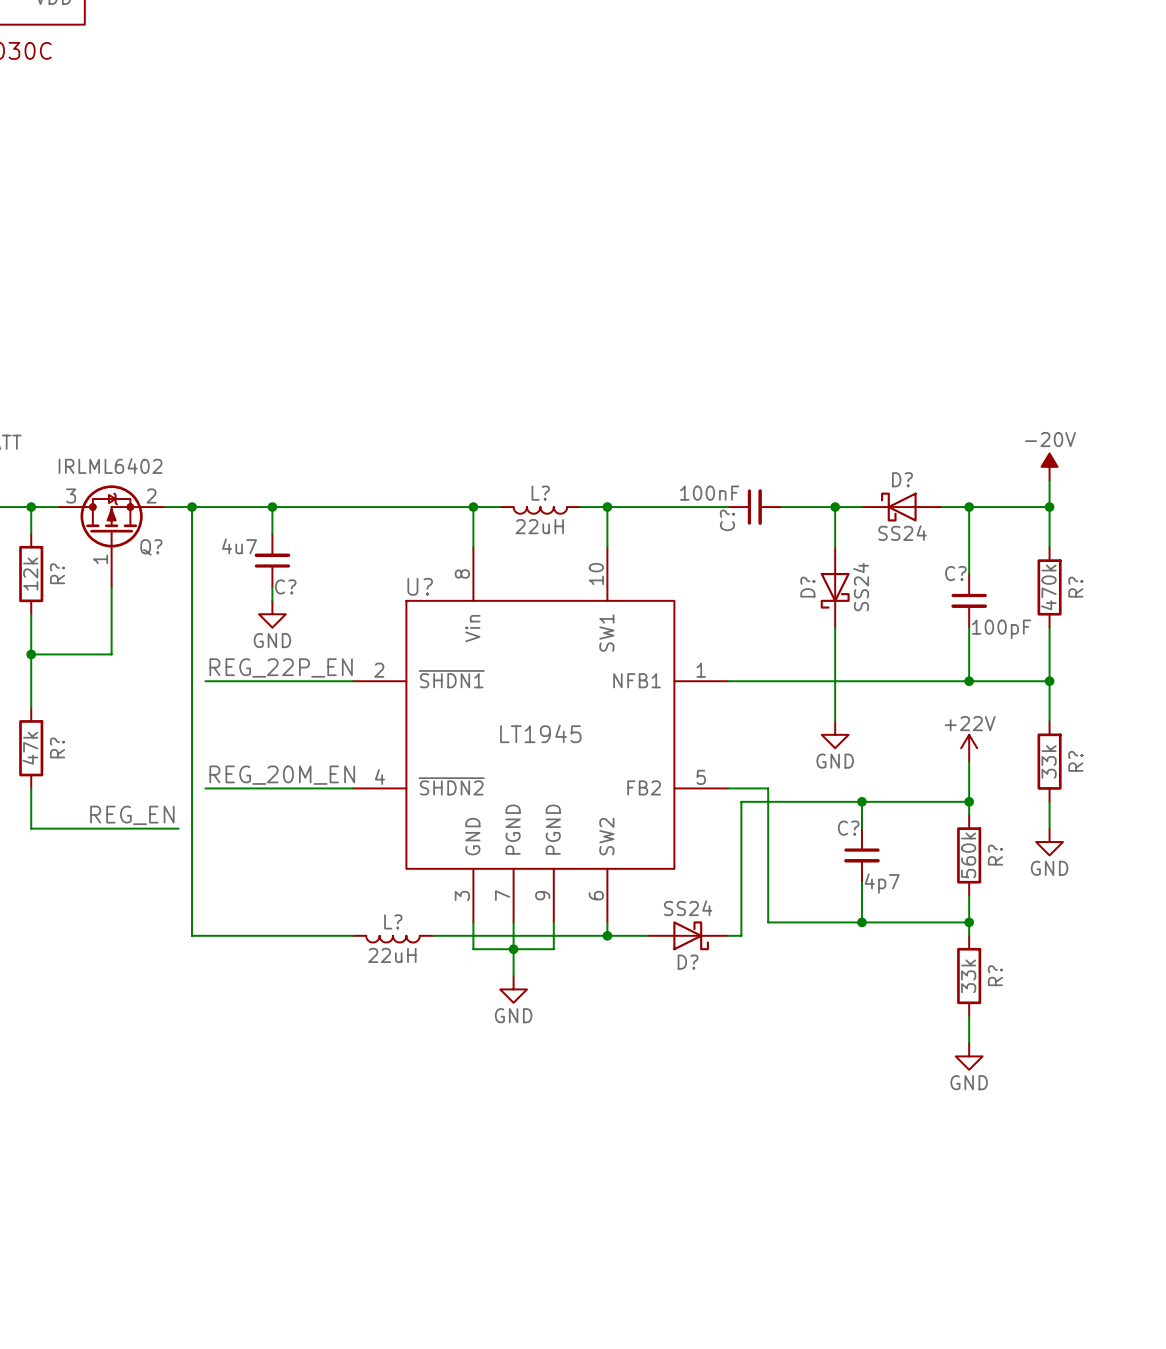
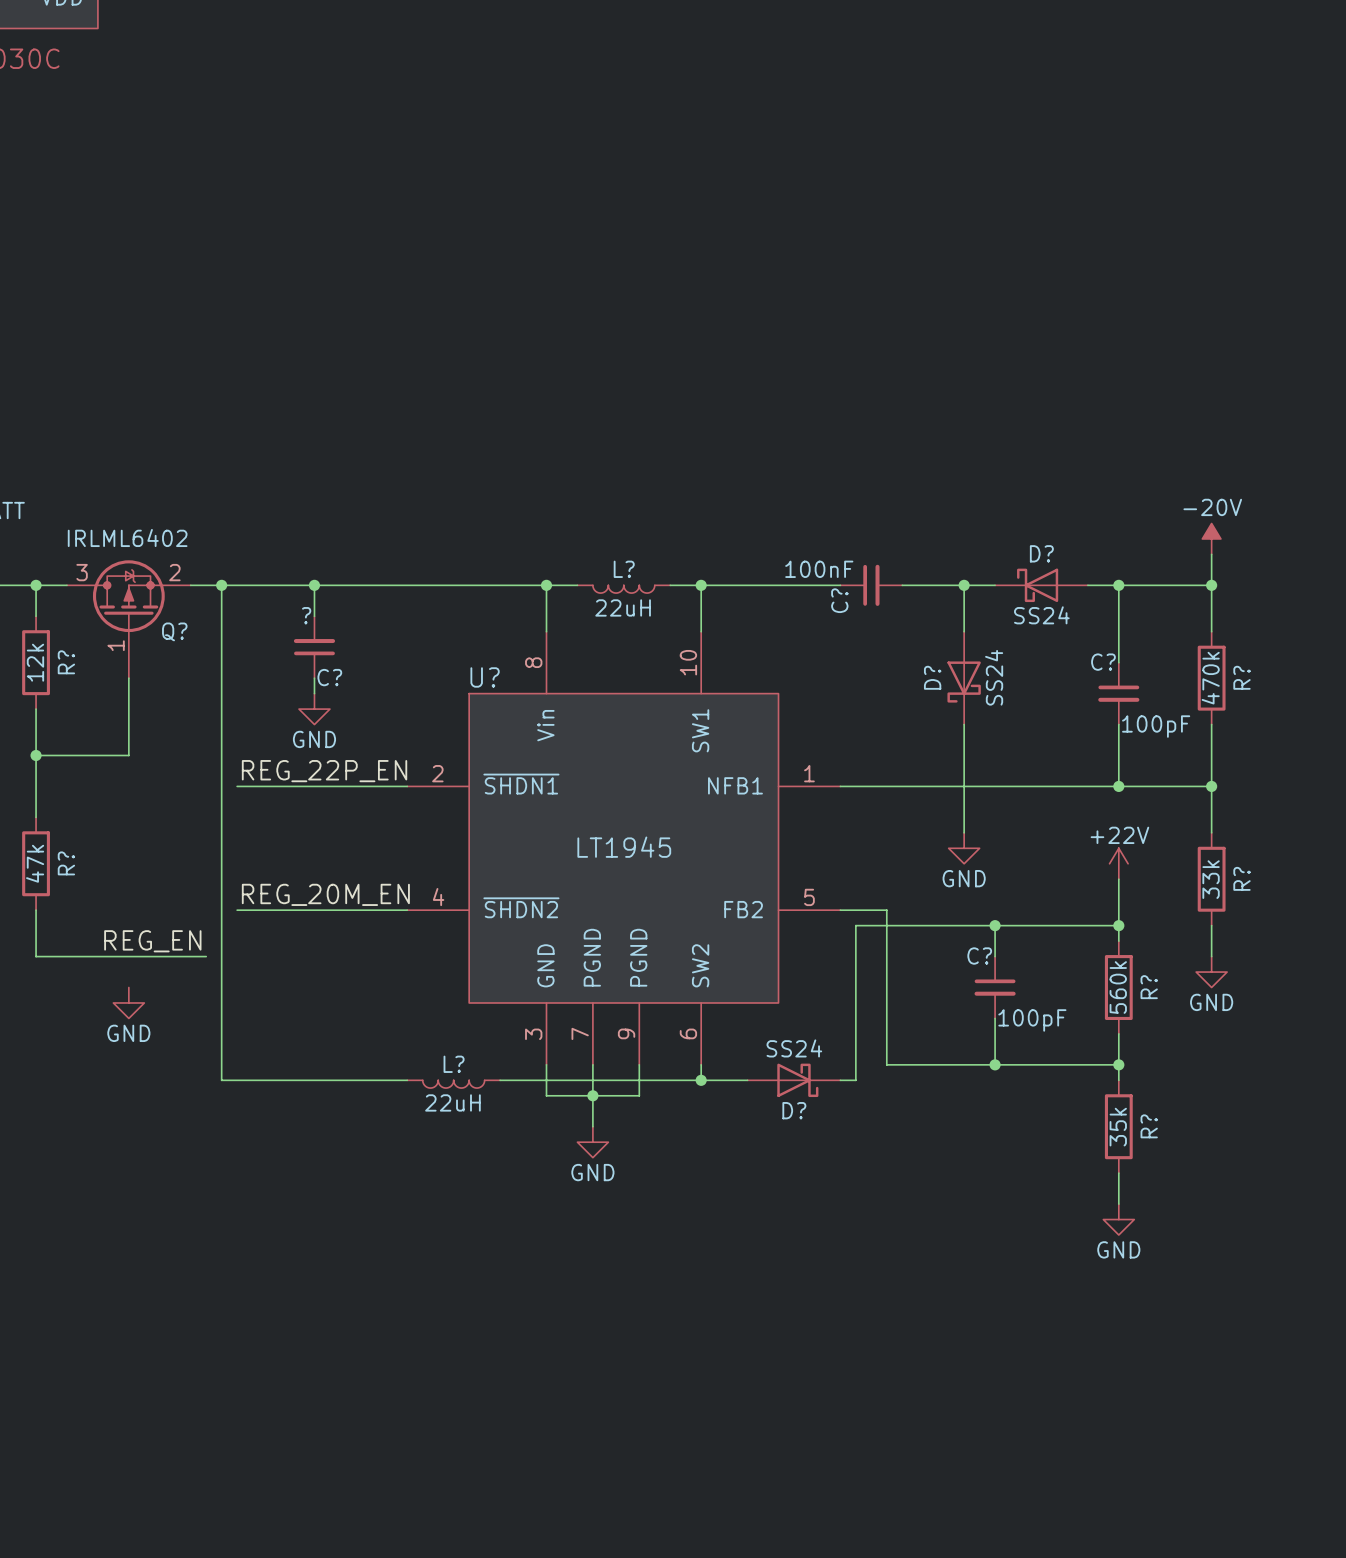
C? value: 4u7 (239, 546) -> ? (306, 615)
power symbol: none -> GND (128, 1002)
C? value: 4p7 (882, 883) -> 100pF (1032, 1020)
R? value: 33k (968, 976) -> 35k (1118, 1127)

